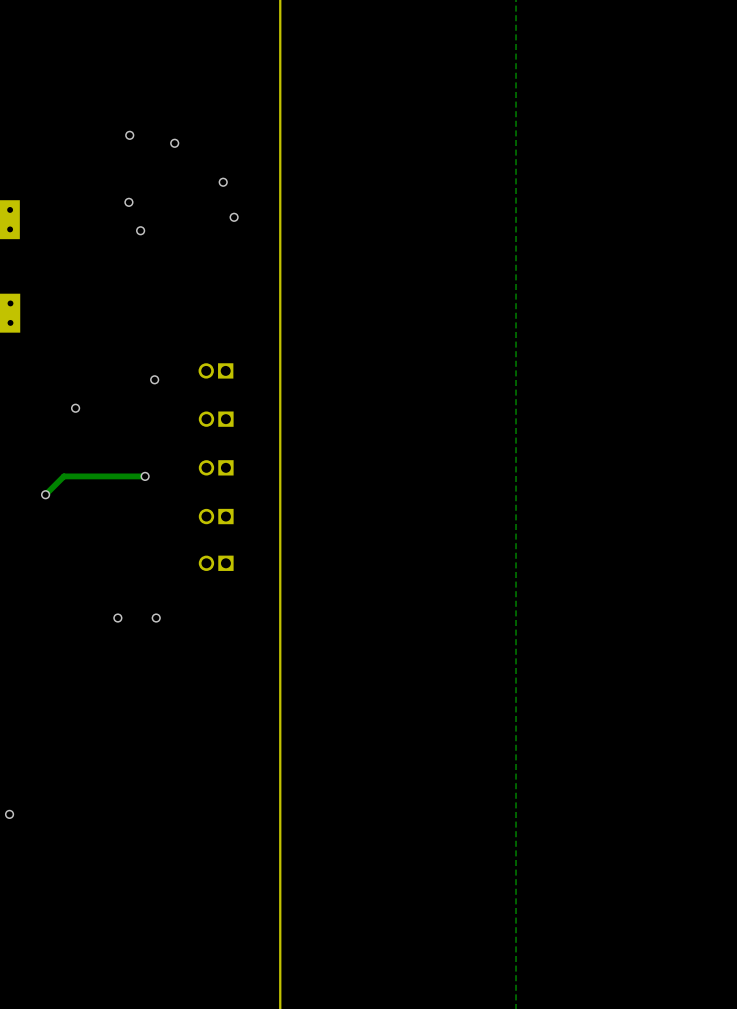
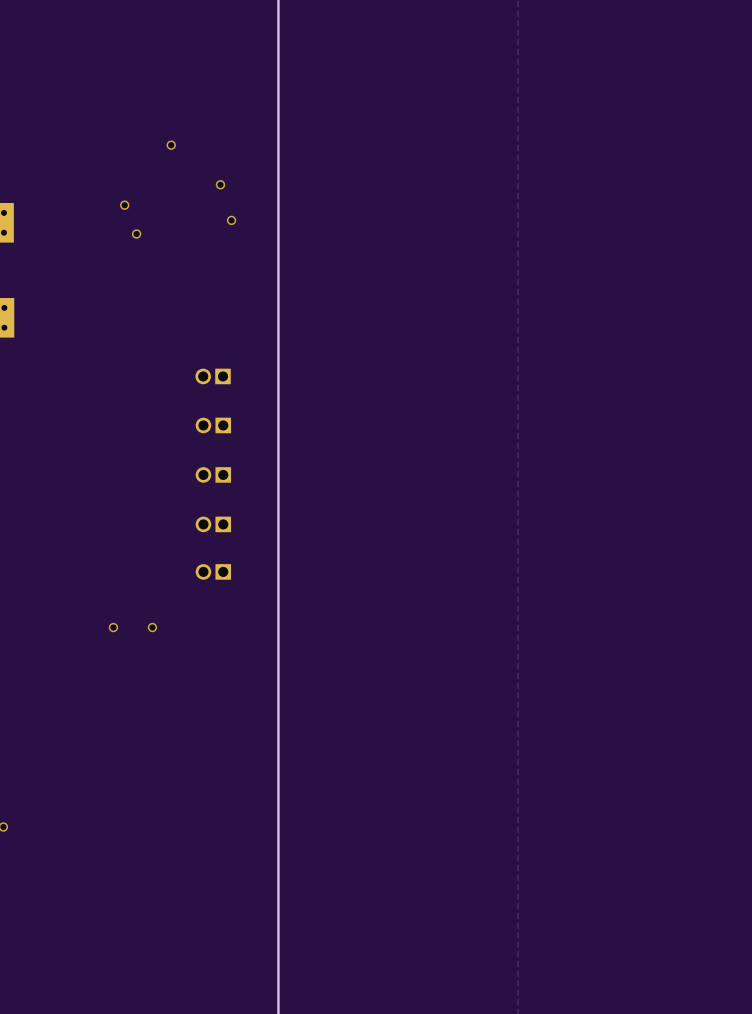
via: (129, 135) -> none
via: (154, 379) -> none
via: (75, 408) -> none
track: (145, 476) (63, 476) (45, 494) -> none
via: (145, 476) -> none
via: (45, 494) -> none

